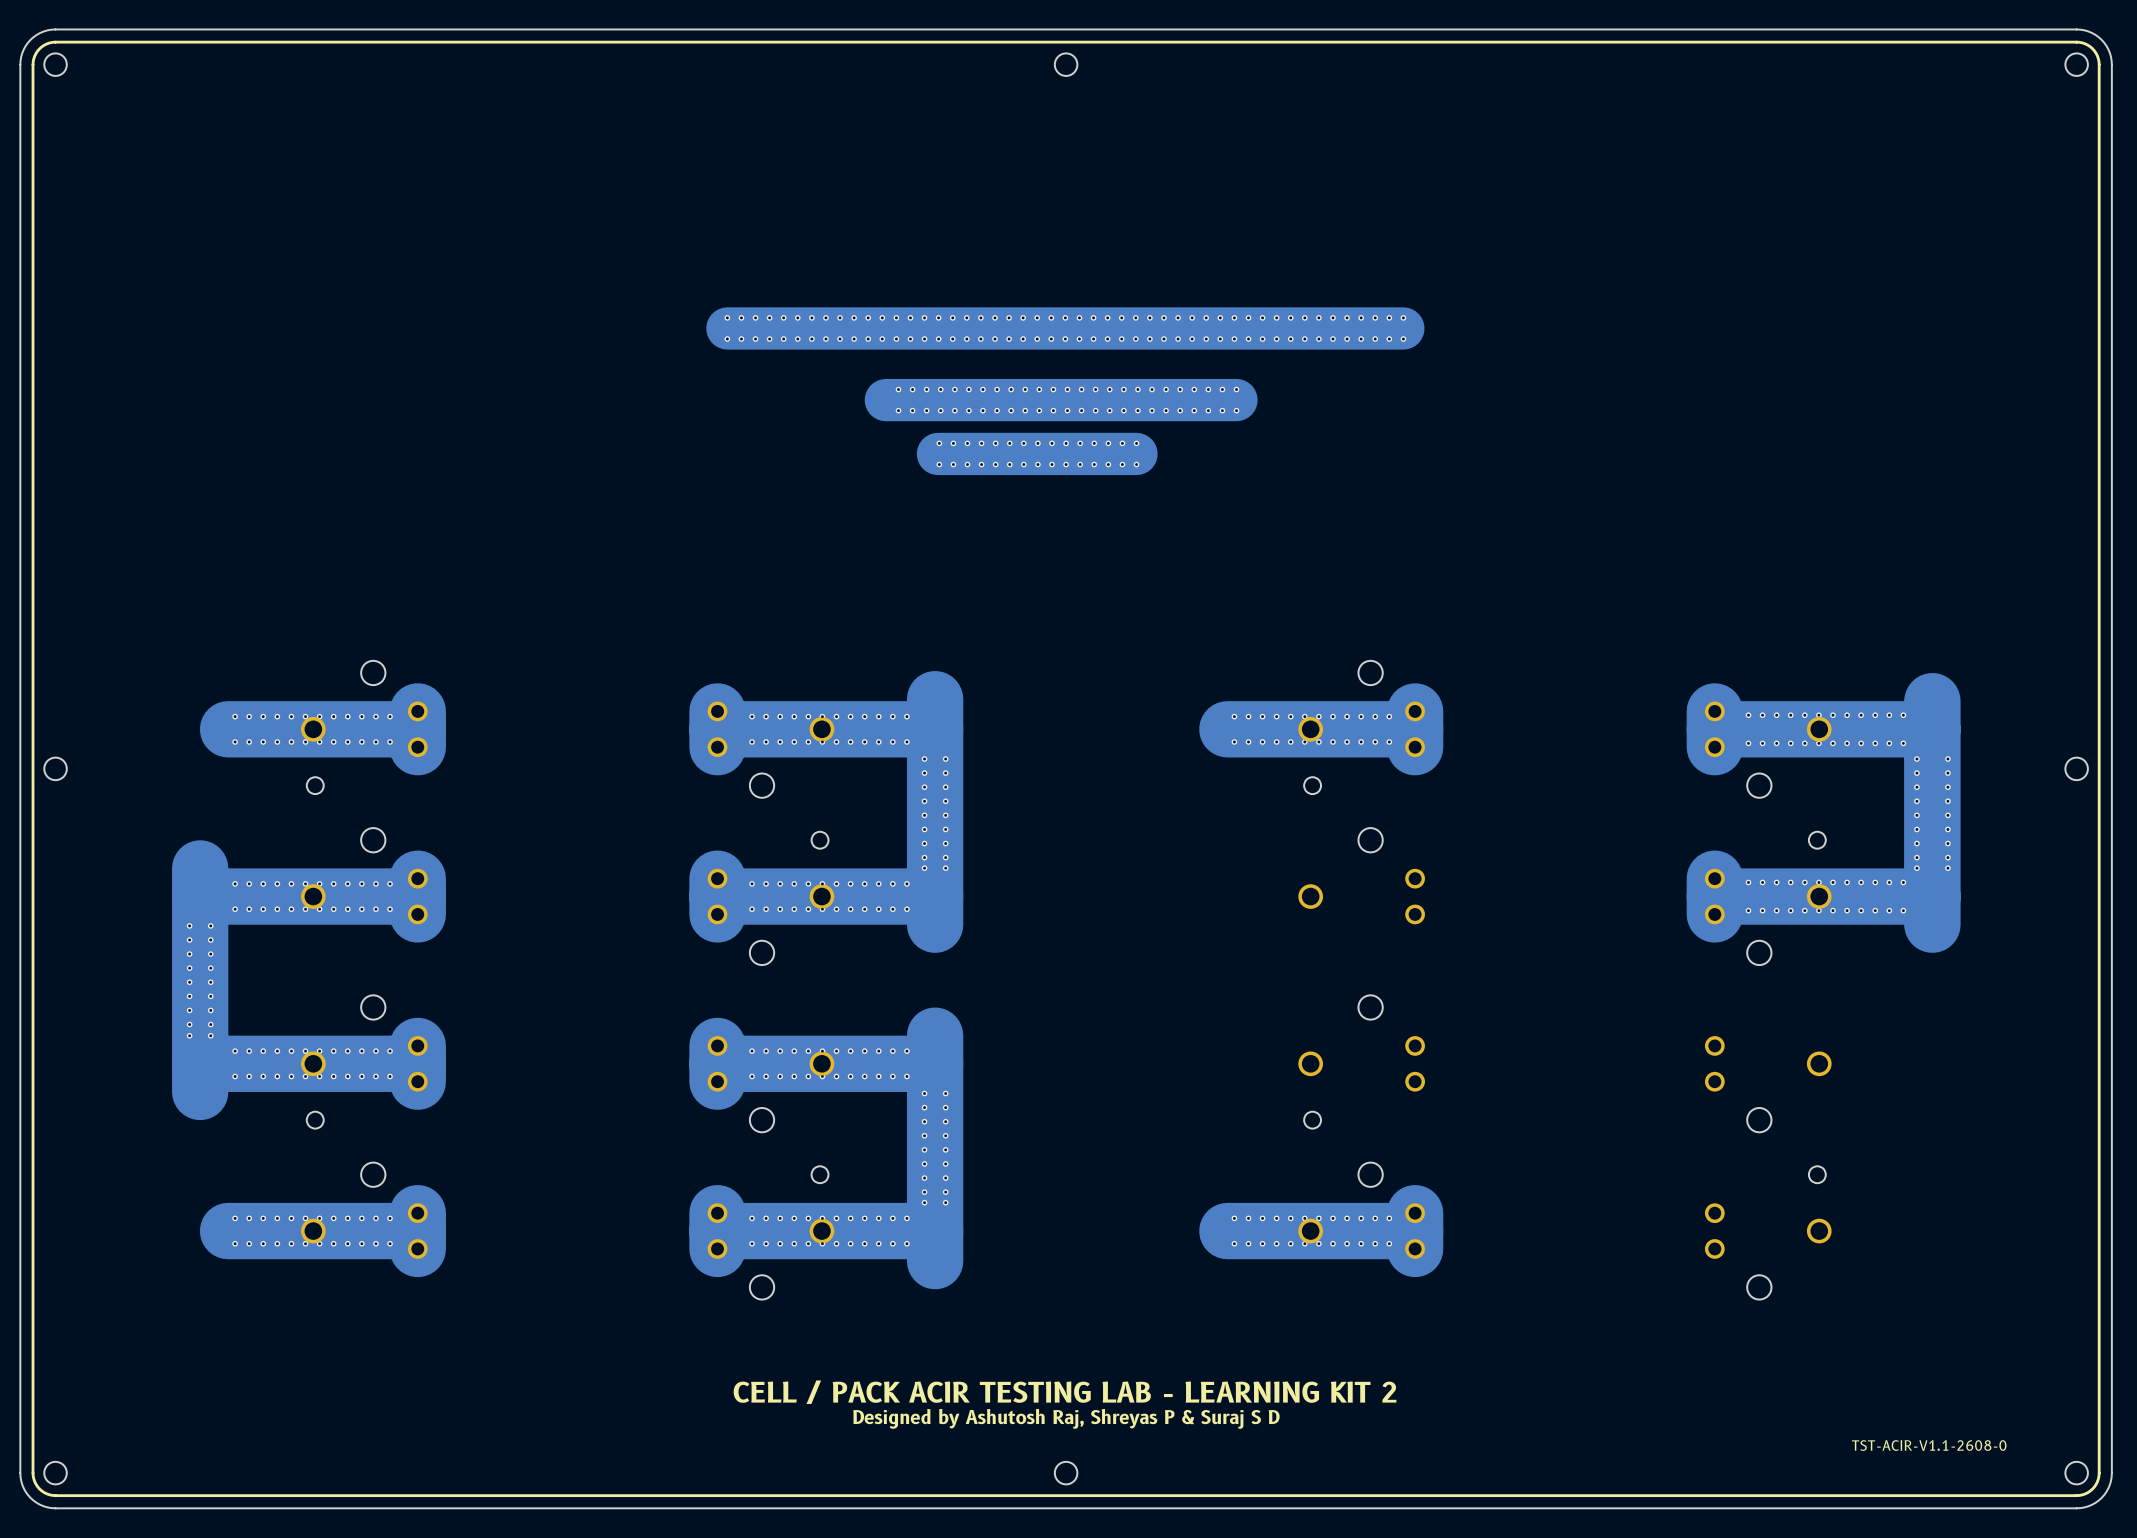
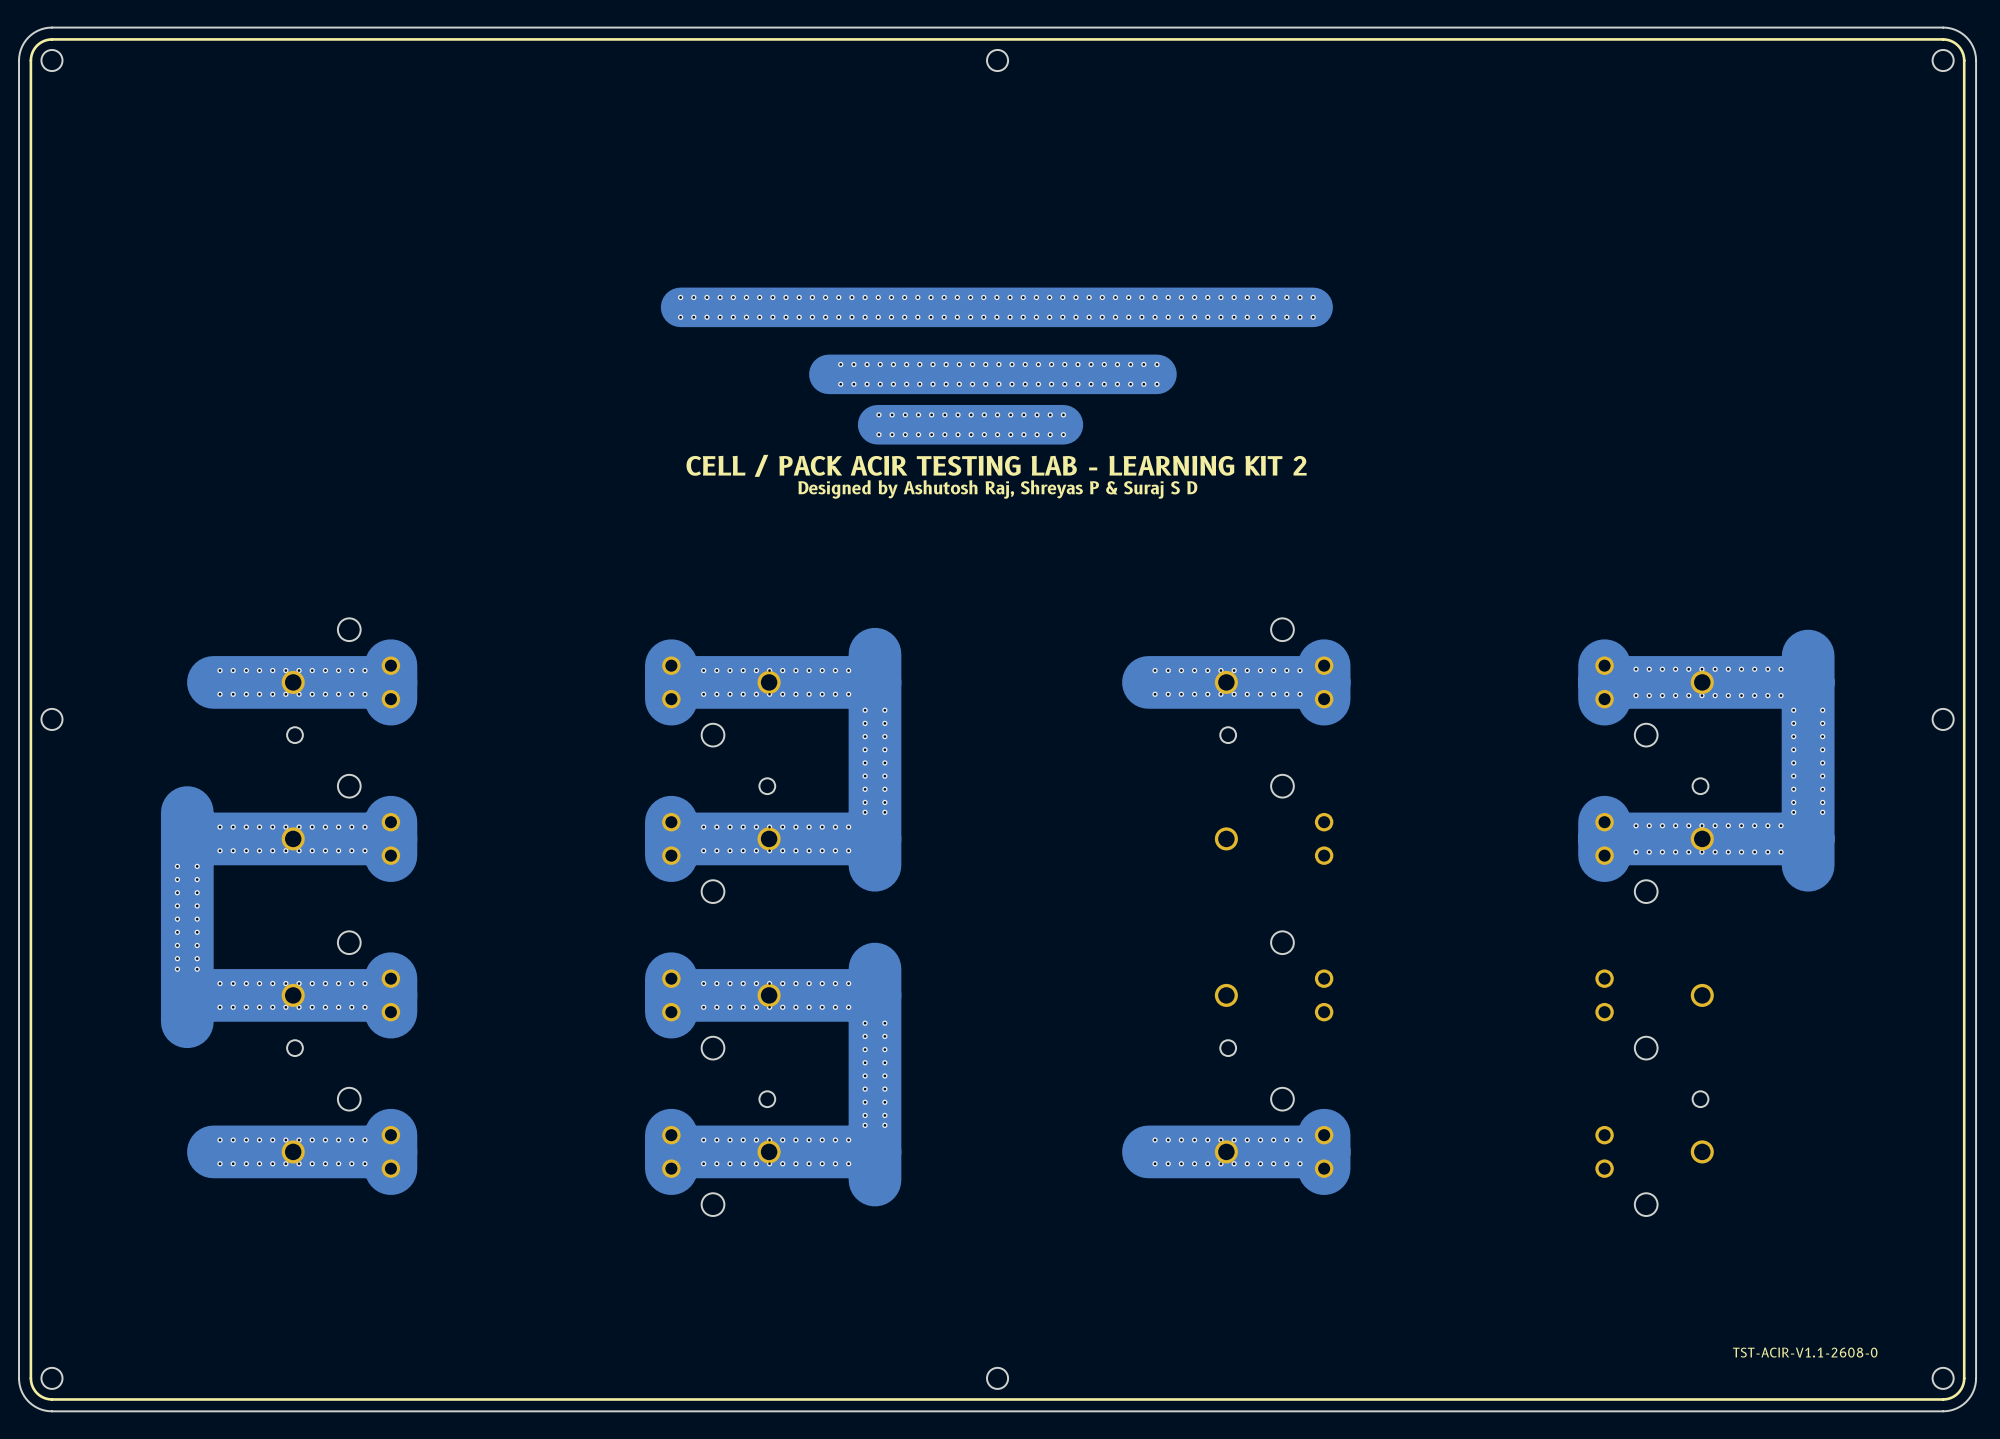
text: none -> CELL / PACK ACIR TESTING LAB - LEARNING KIT 2 (996, 465)
text: none -> Designed by Ashutosh Raj, Shreyas P & Suraj S D (997, 489)
text: CELL / PACK ACIR TESTING LAB - LEARNING KIT 2 (1065, 1392) -> none
text: Designed by Ashutosh Raj, Shreyas P & Suraj S D (1066, 1418) -> none

